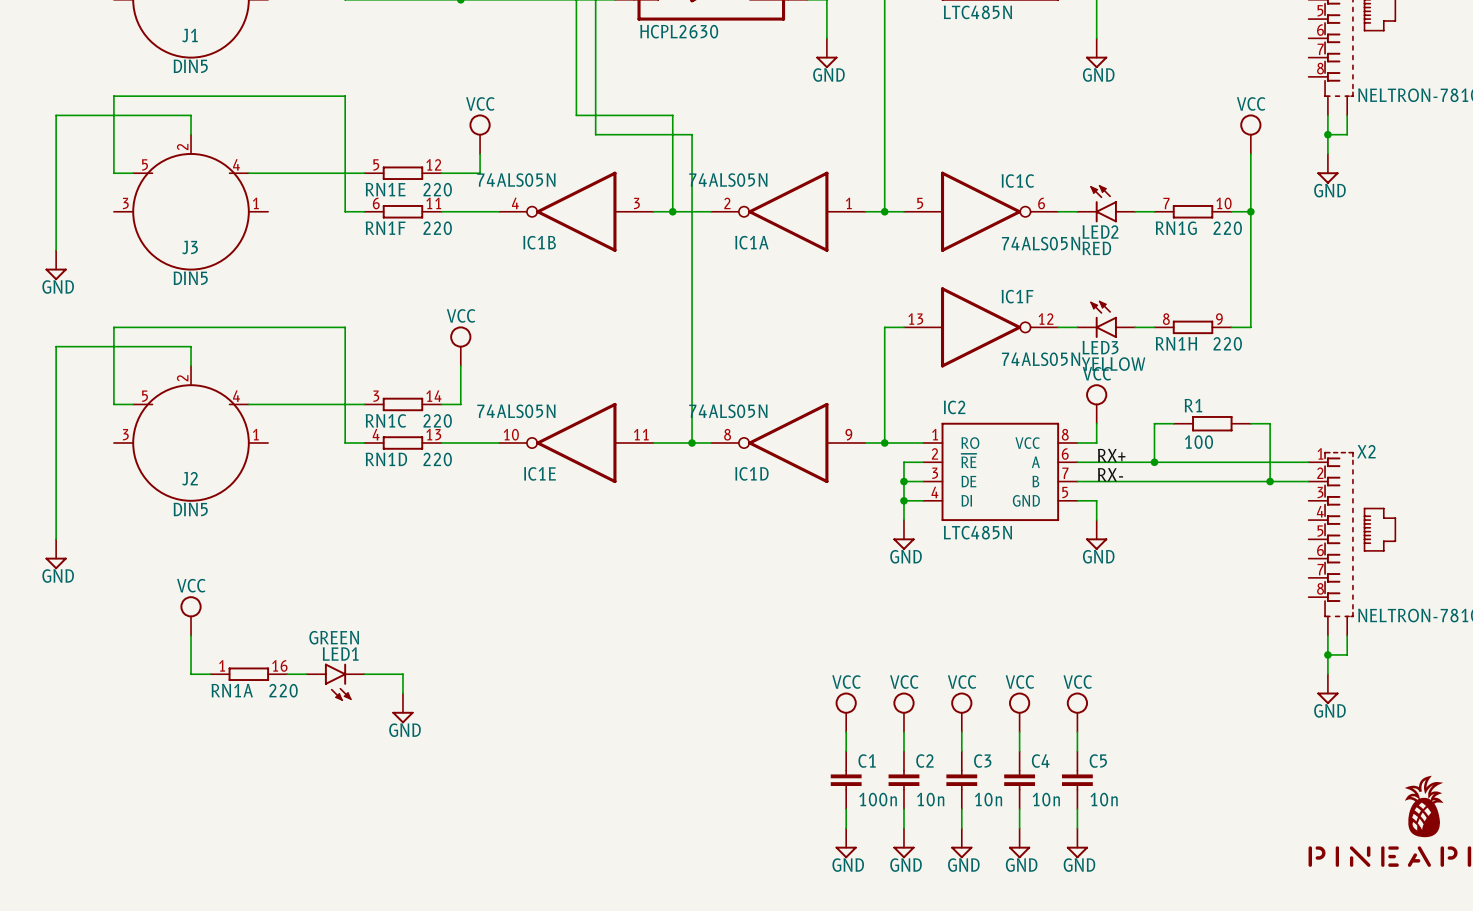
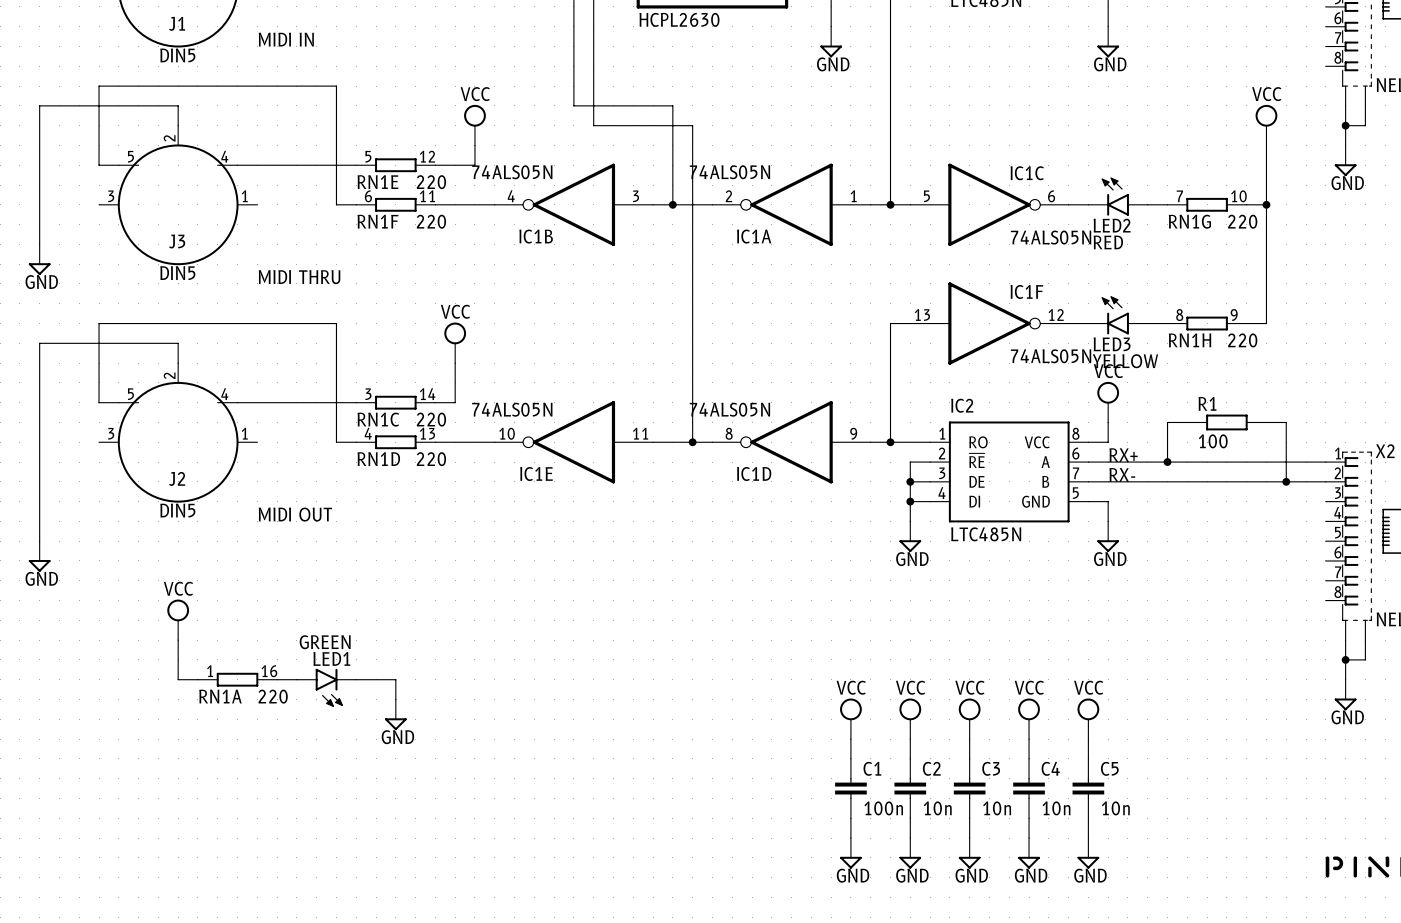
text: none -> MIDI IN (286, 39)
text: none -> MIDI THRU (299, 277)
text: none -> MIDI OUT (295, 514)

